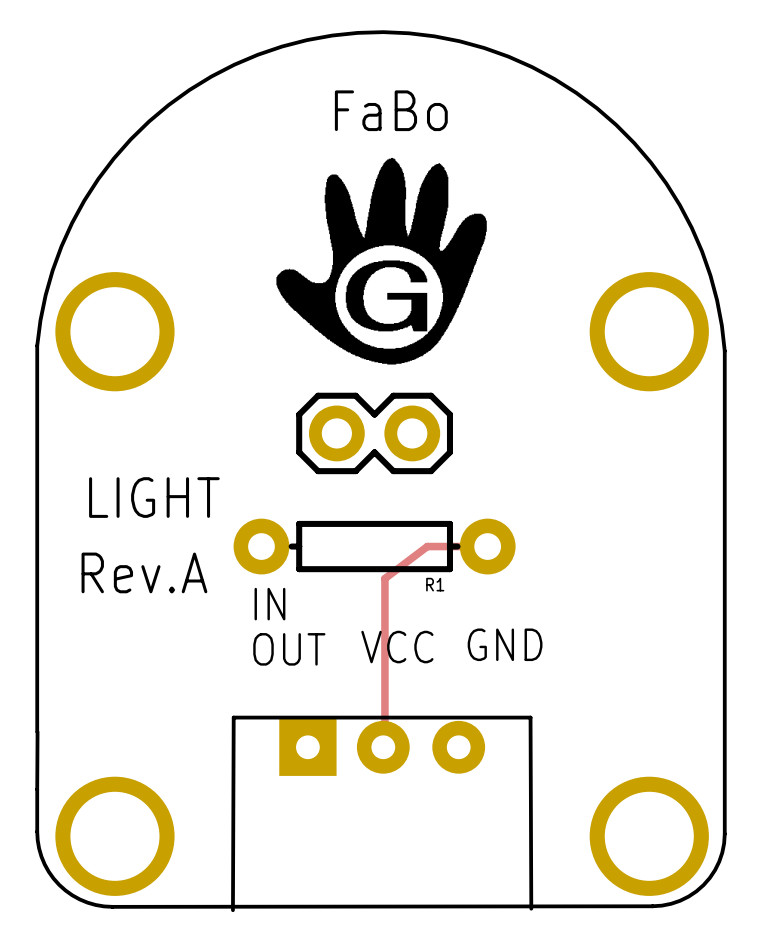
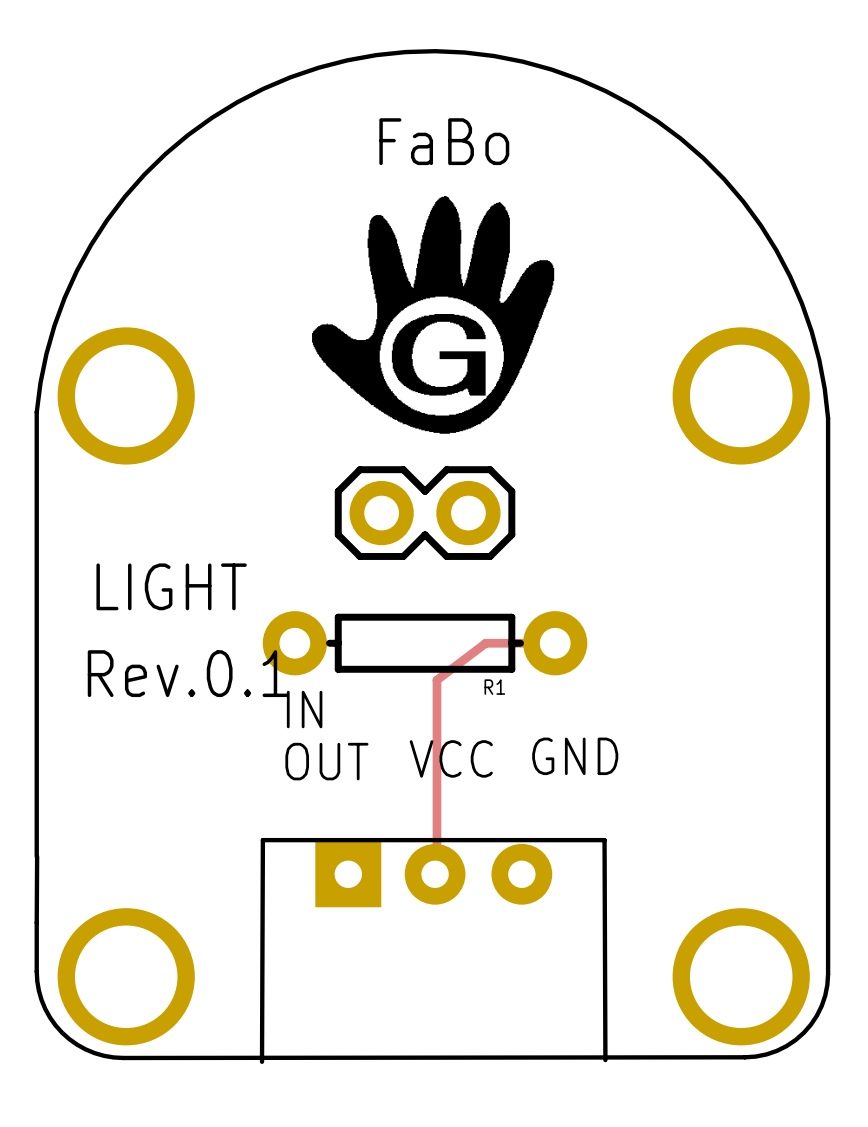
text: Rev.A (144, 572) -> Rev.0.1 (188, 673)

